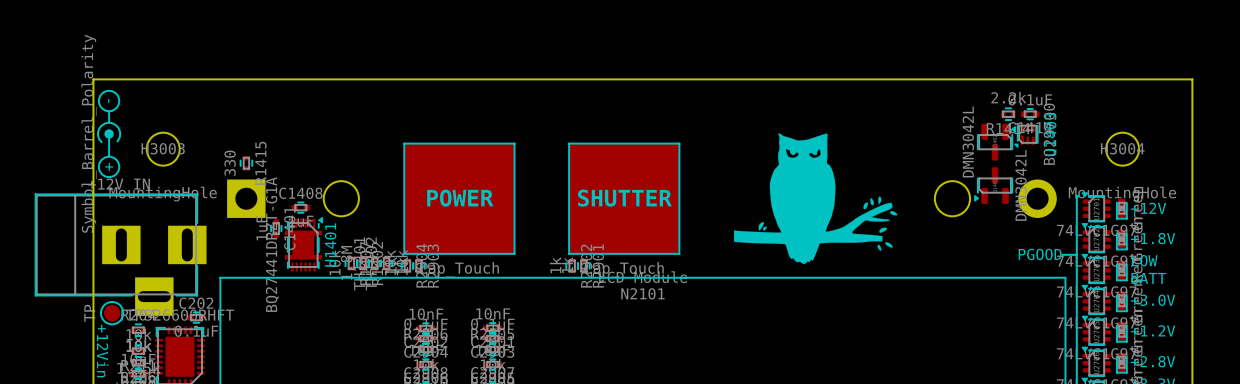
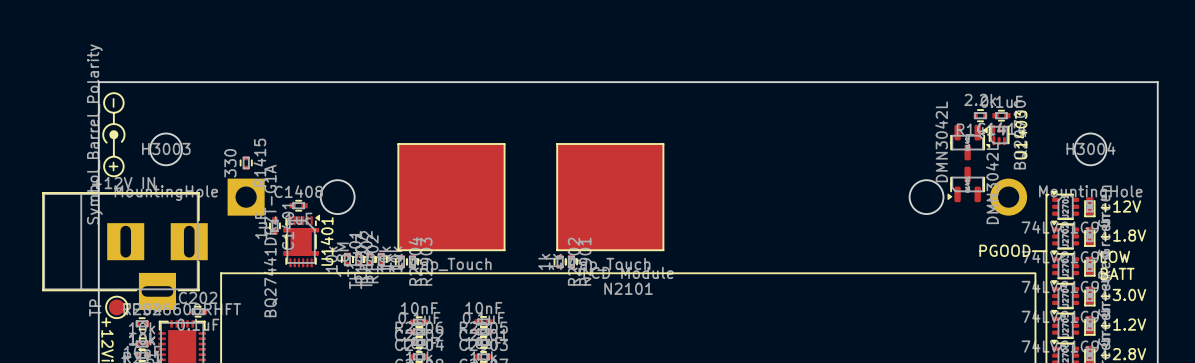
drawing: [734, 133, 898, 264] -> none
text: POWER (460, 198) -> none
text: SHUTTER (624, 198) -> none

